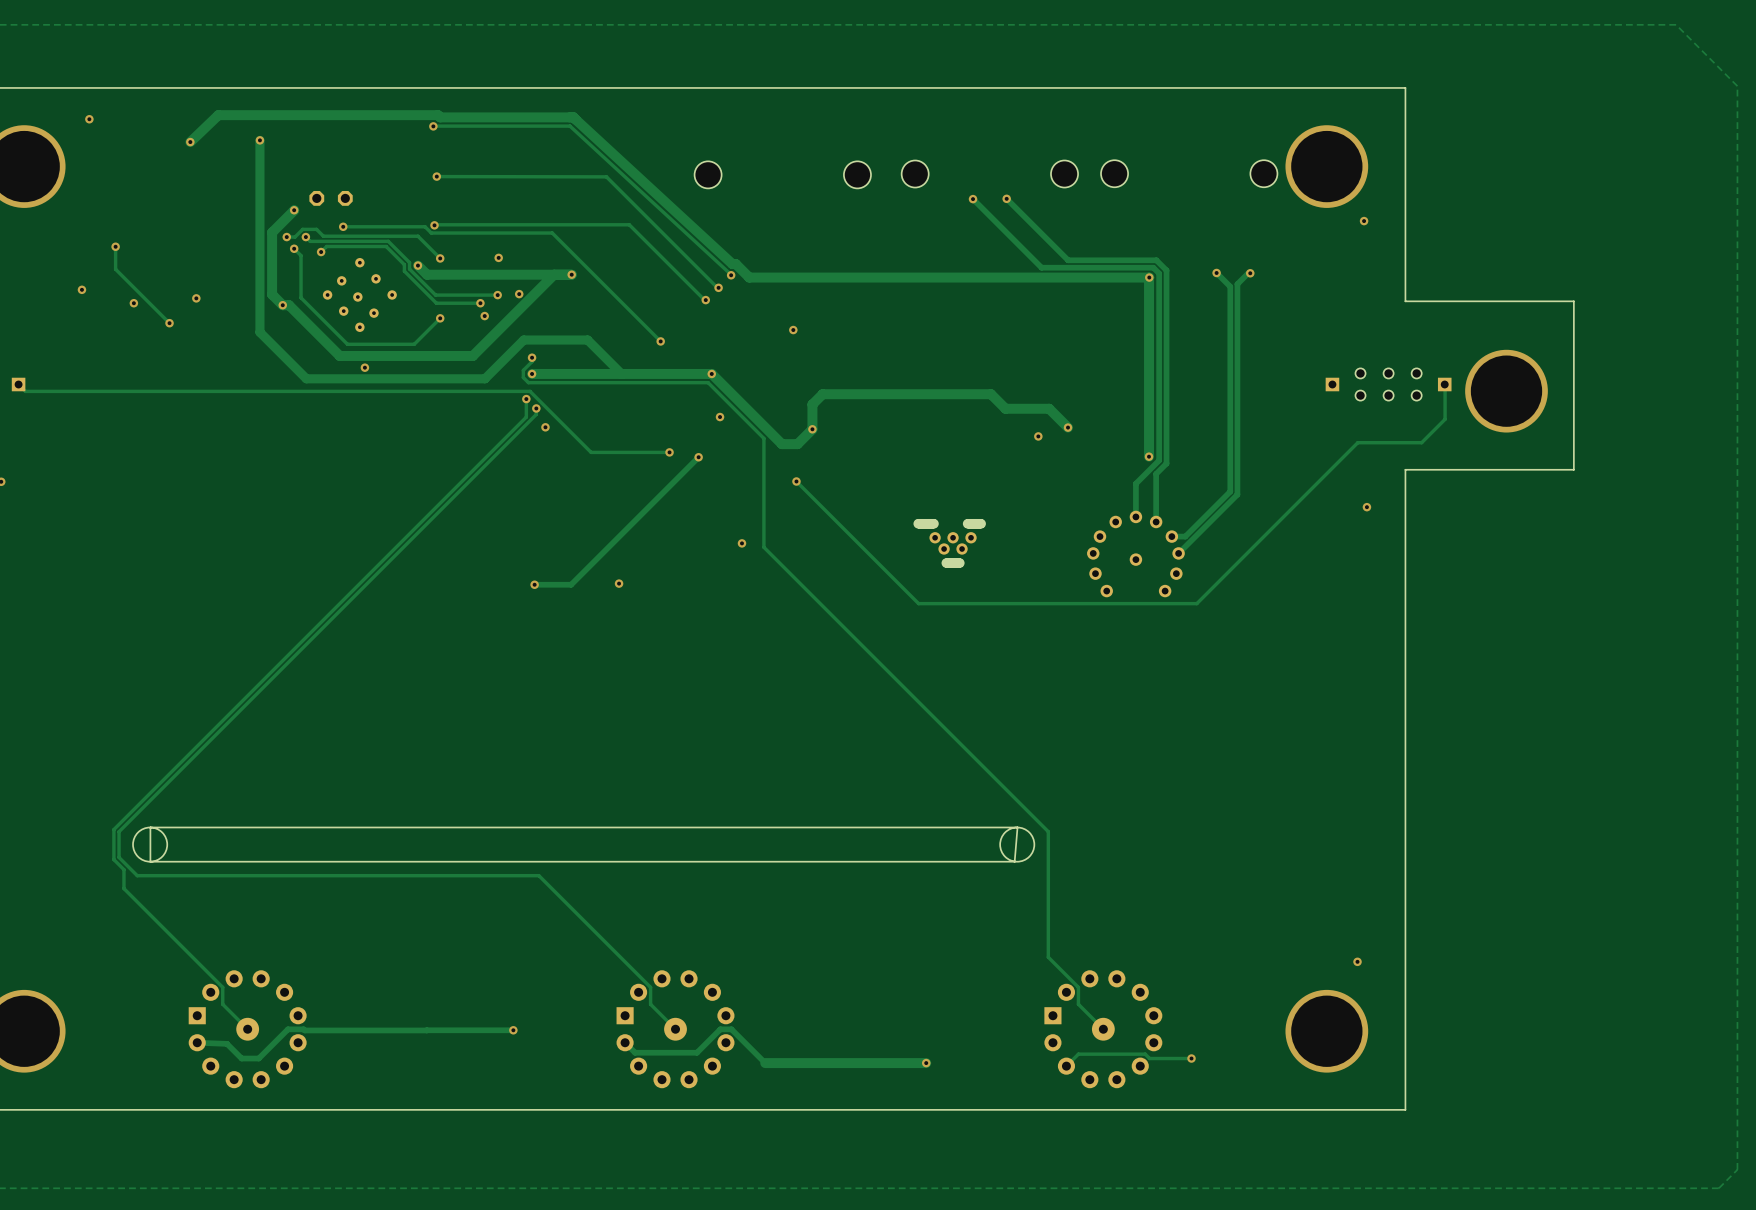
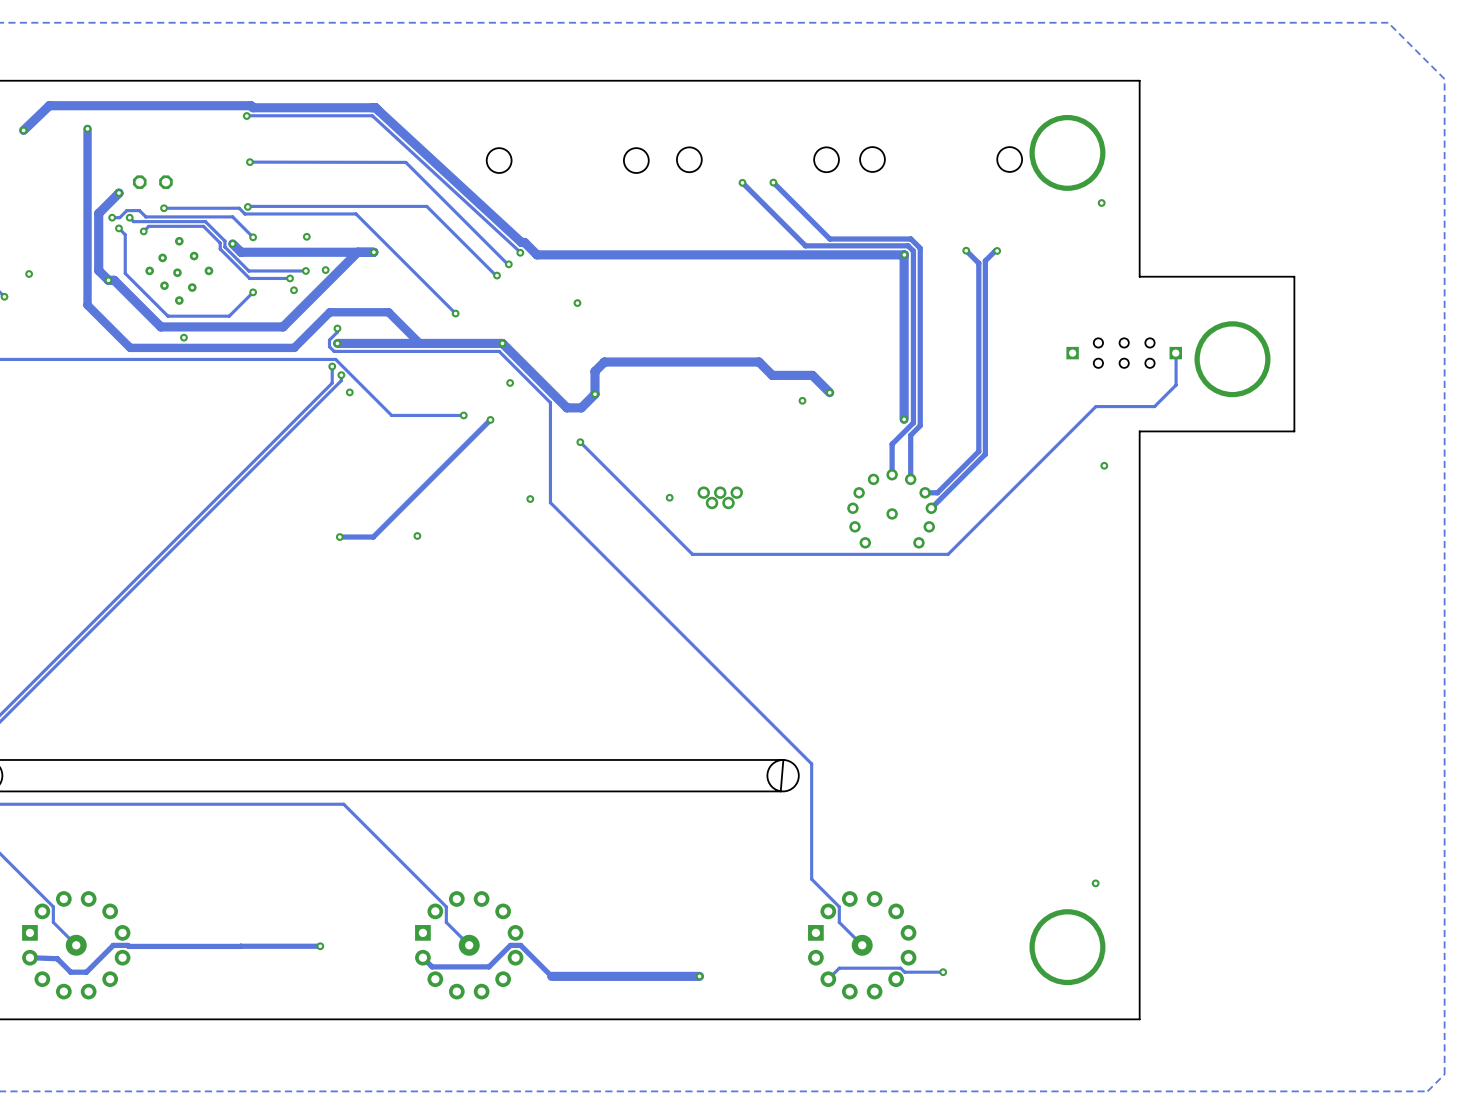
part footprint: [914, 519, 986, 567] -> [697, 486, 743, 510]
via: none -> (669, 497)

